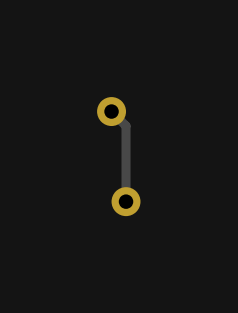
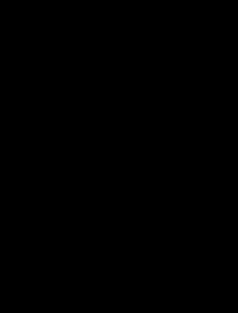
track: (111, 111) (126, 126) (126, 201) -> none
via: (111, 111) -> none
via: (126, 201) -> none

